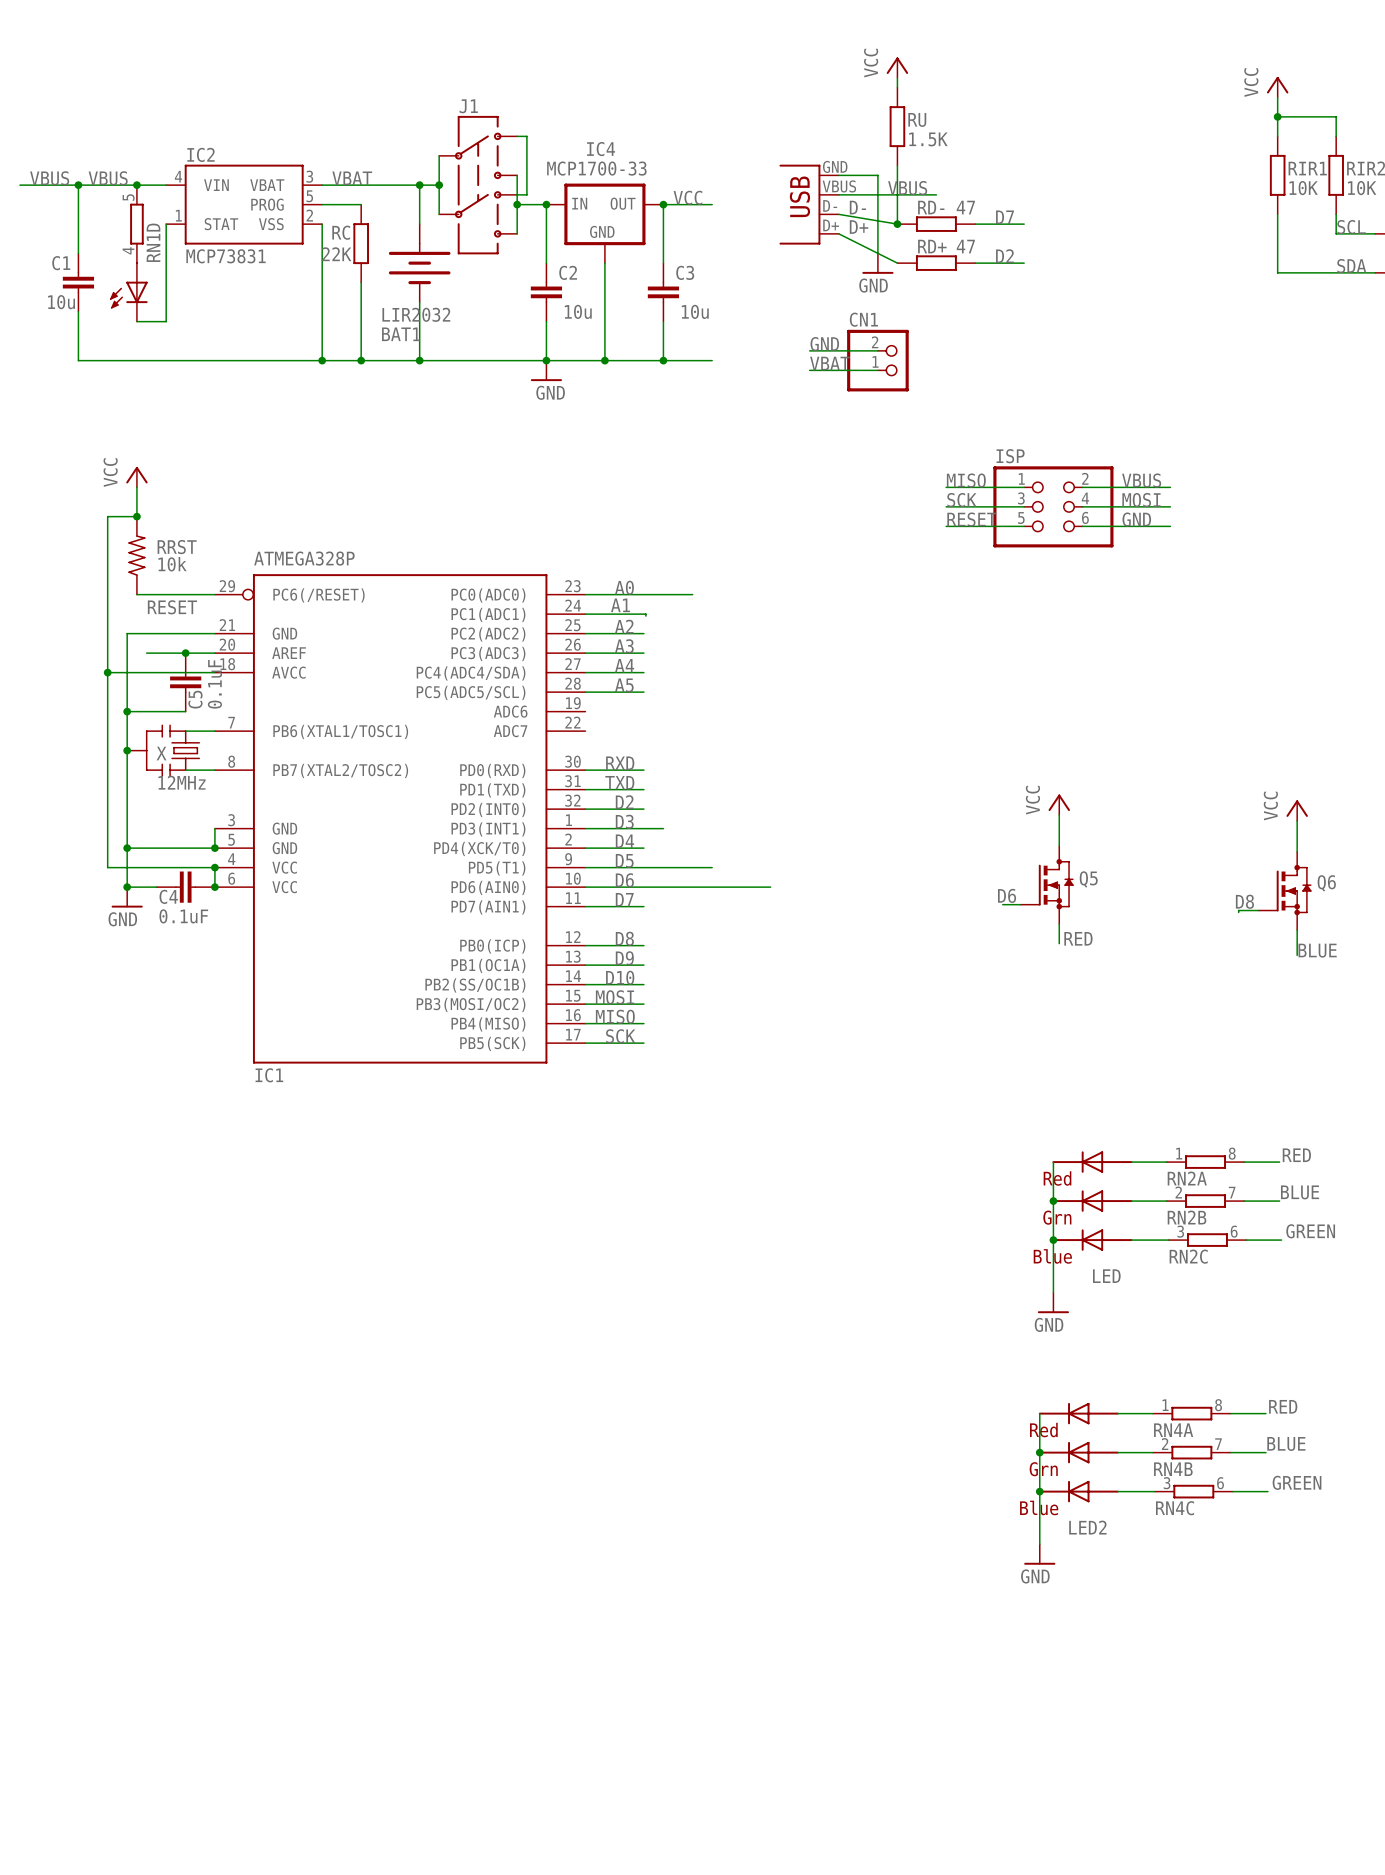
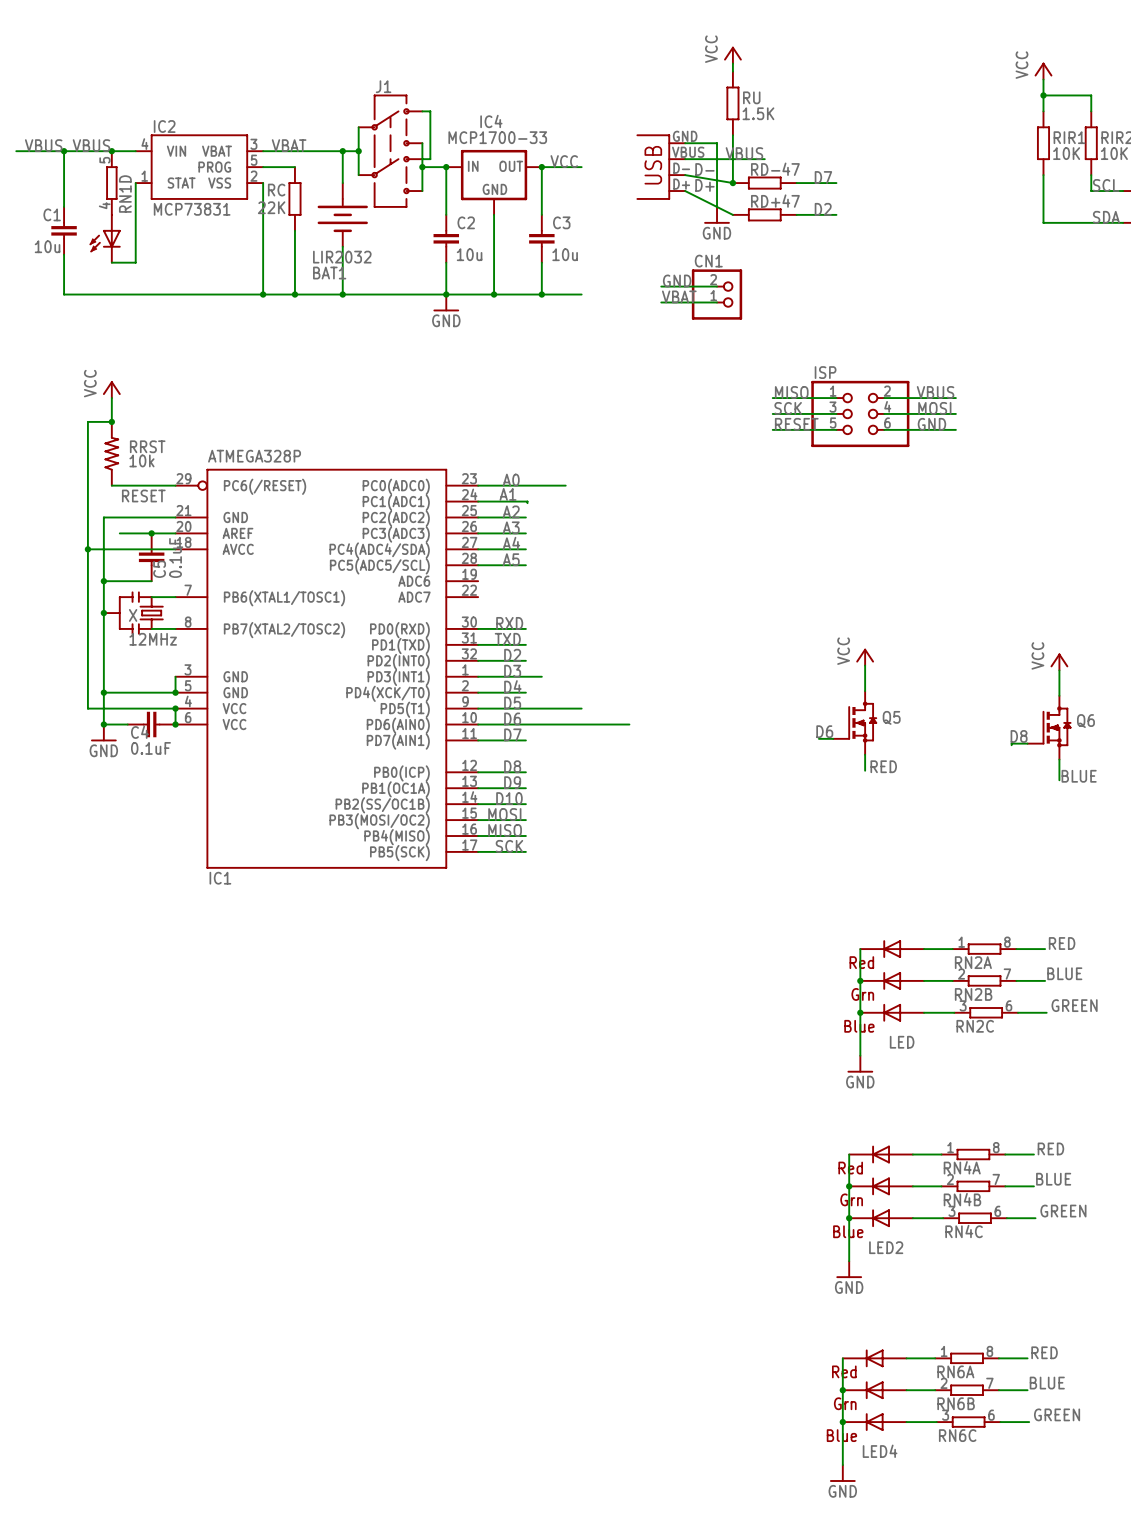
label: none -> RED (1044, 1352)
wire: none -> (842, 1358) (842, 1465)
wire: none -> (906, 1358) (935, 1358)
RN6A: none -> (967, 1358)
wire: none -> (998, 1358) (1027, 1358)
label: none -> BLUE (1047, 1383)
junction: none -> (842, 1390)
LED4: none -> (874, 1390)
wire: none -> (906, 1390) (935, 1390)
RN6B: none -> (967, 1390)
wire: none -> (998, 1390) (1027, 1390)
label: none -> GREEN (1057, 1414)
junction: none -> (842, 1422)
wire: none -> (906, 1422) (936, 1422)
RN6C: none -> (968, 1422)
wire: none -> (1000, 1422) (1029, 1422)
power symbol: none -> GND (842, 1473)

